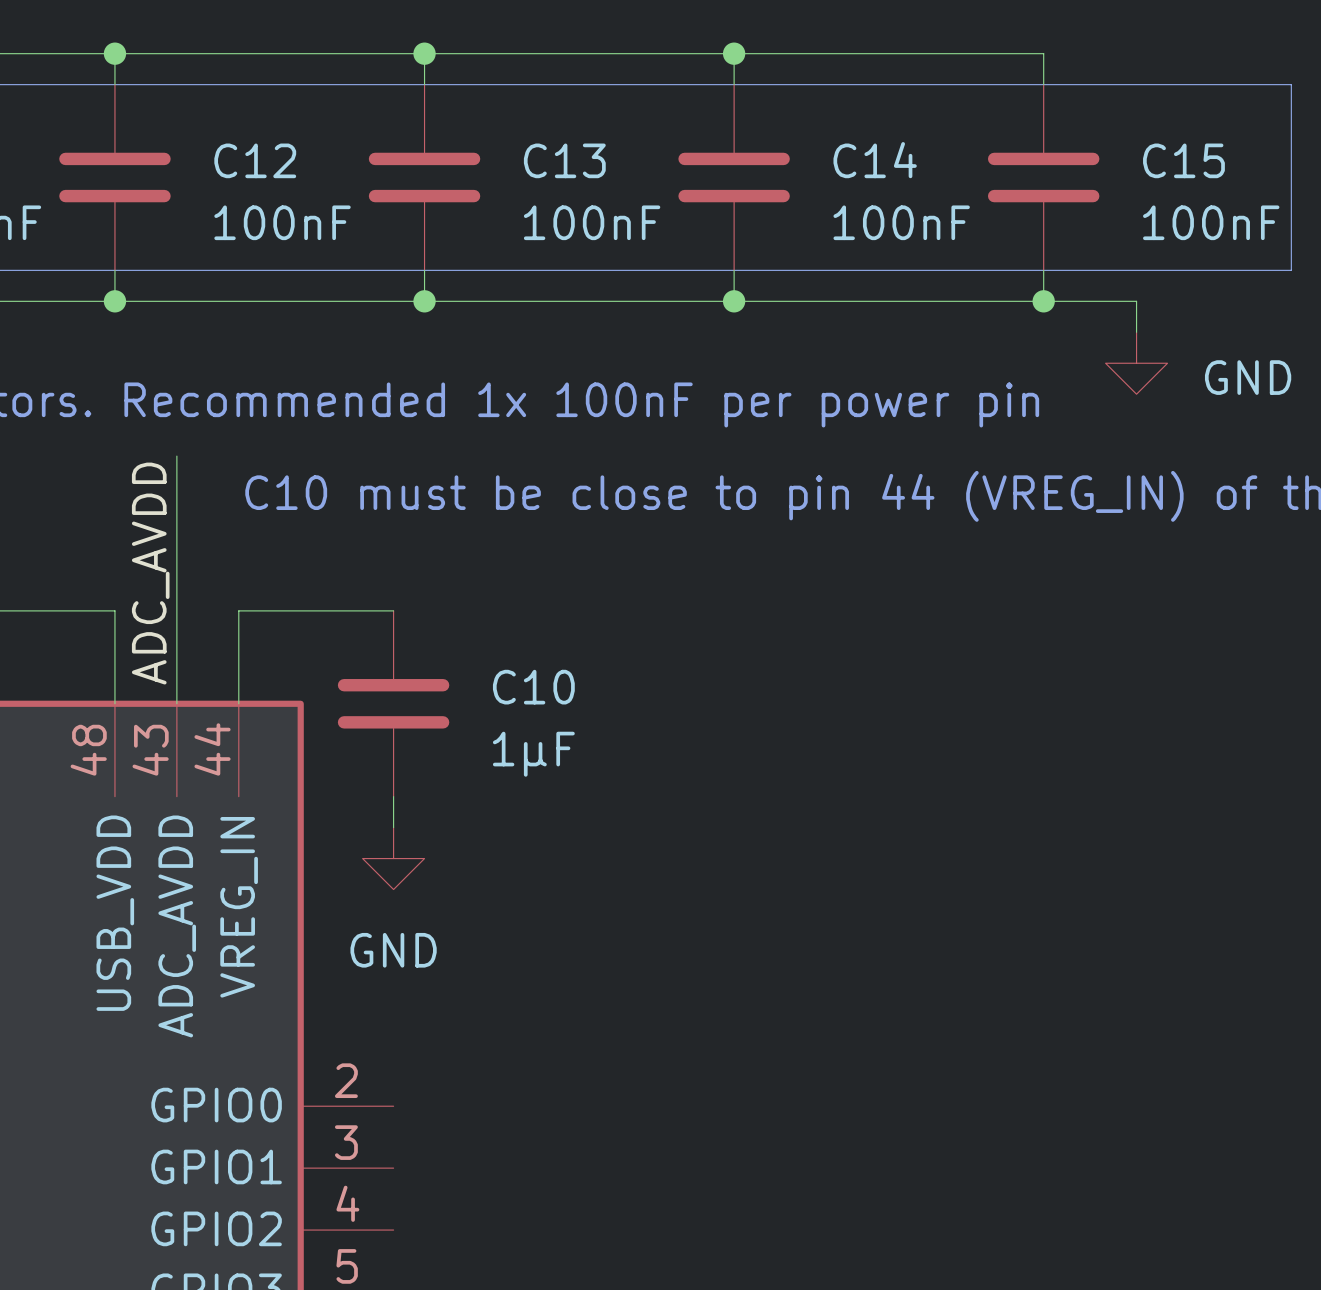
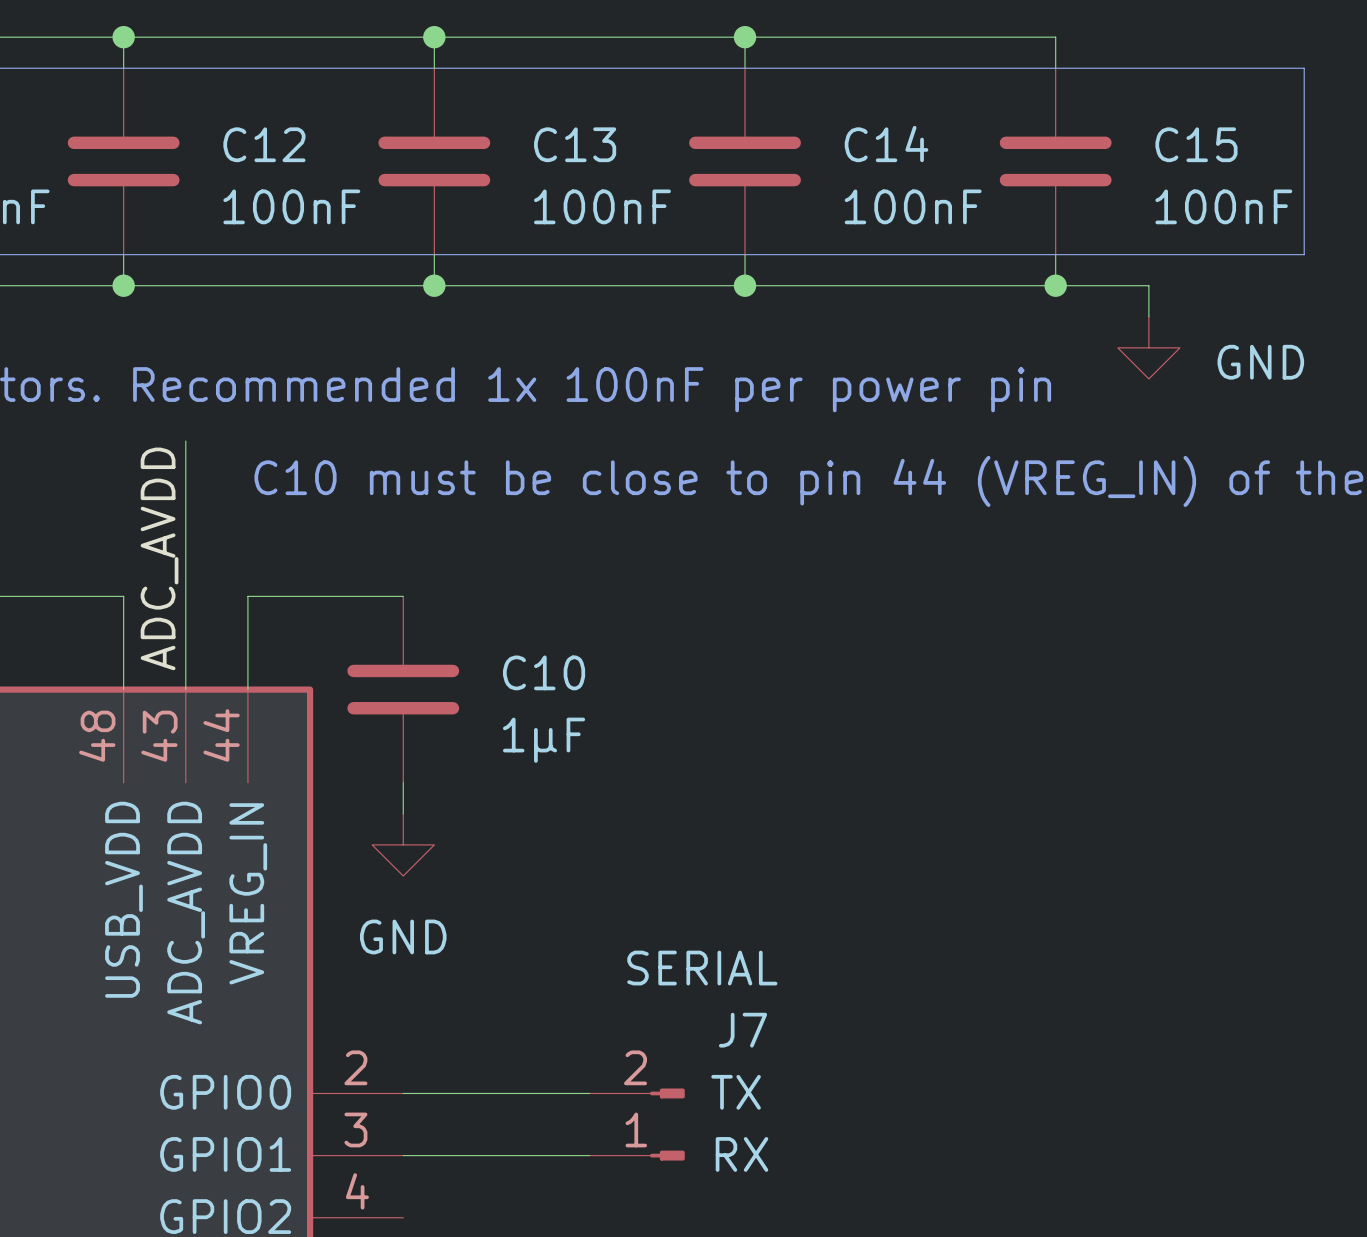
wire: none -> (403, 1093) (589, 1093)
J7: none -> SERIAL (637, 1124)
wire: none -> (403, 1155) (589, 1155)

